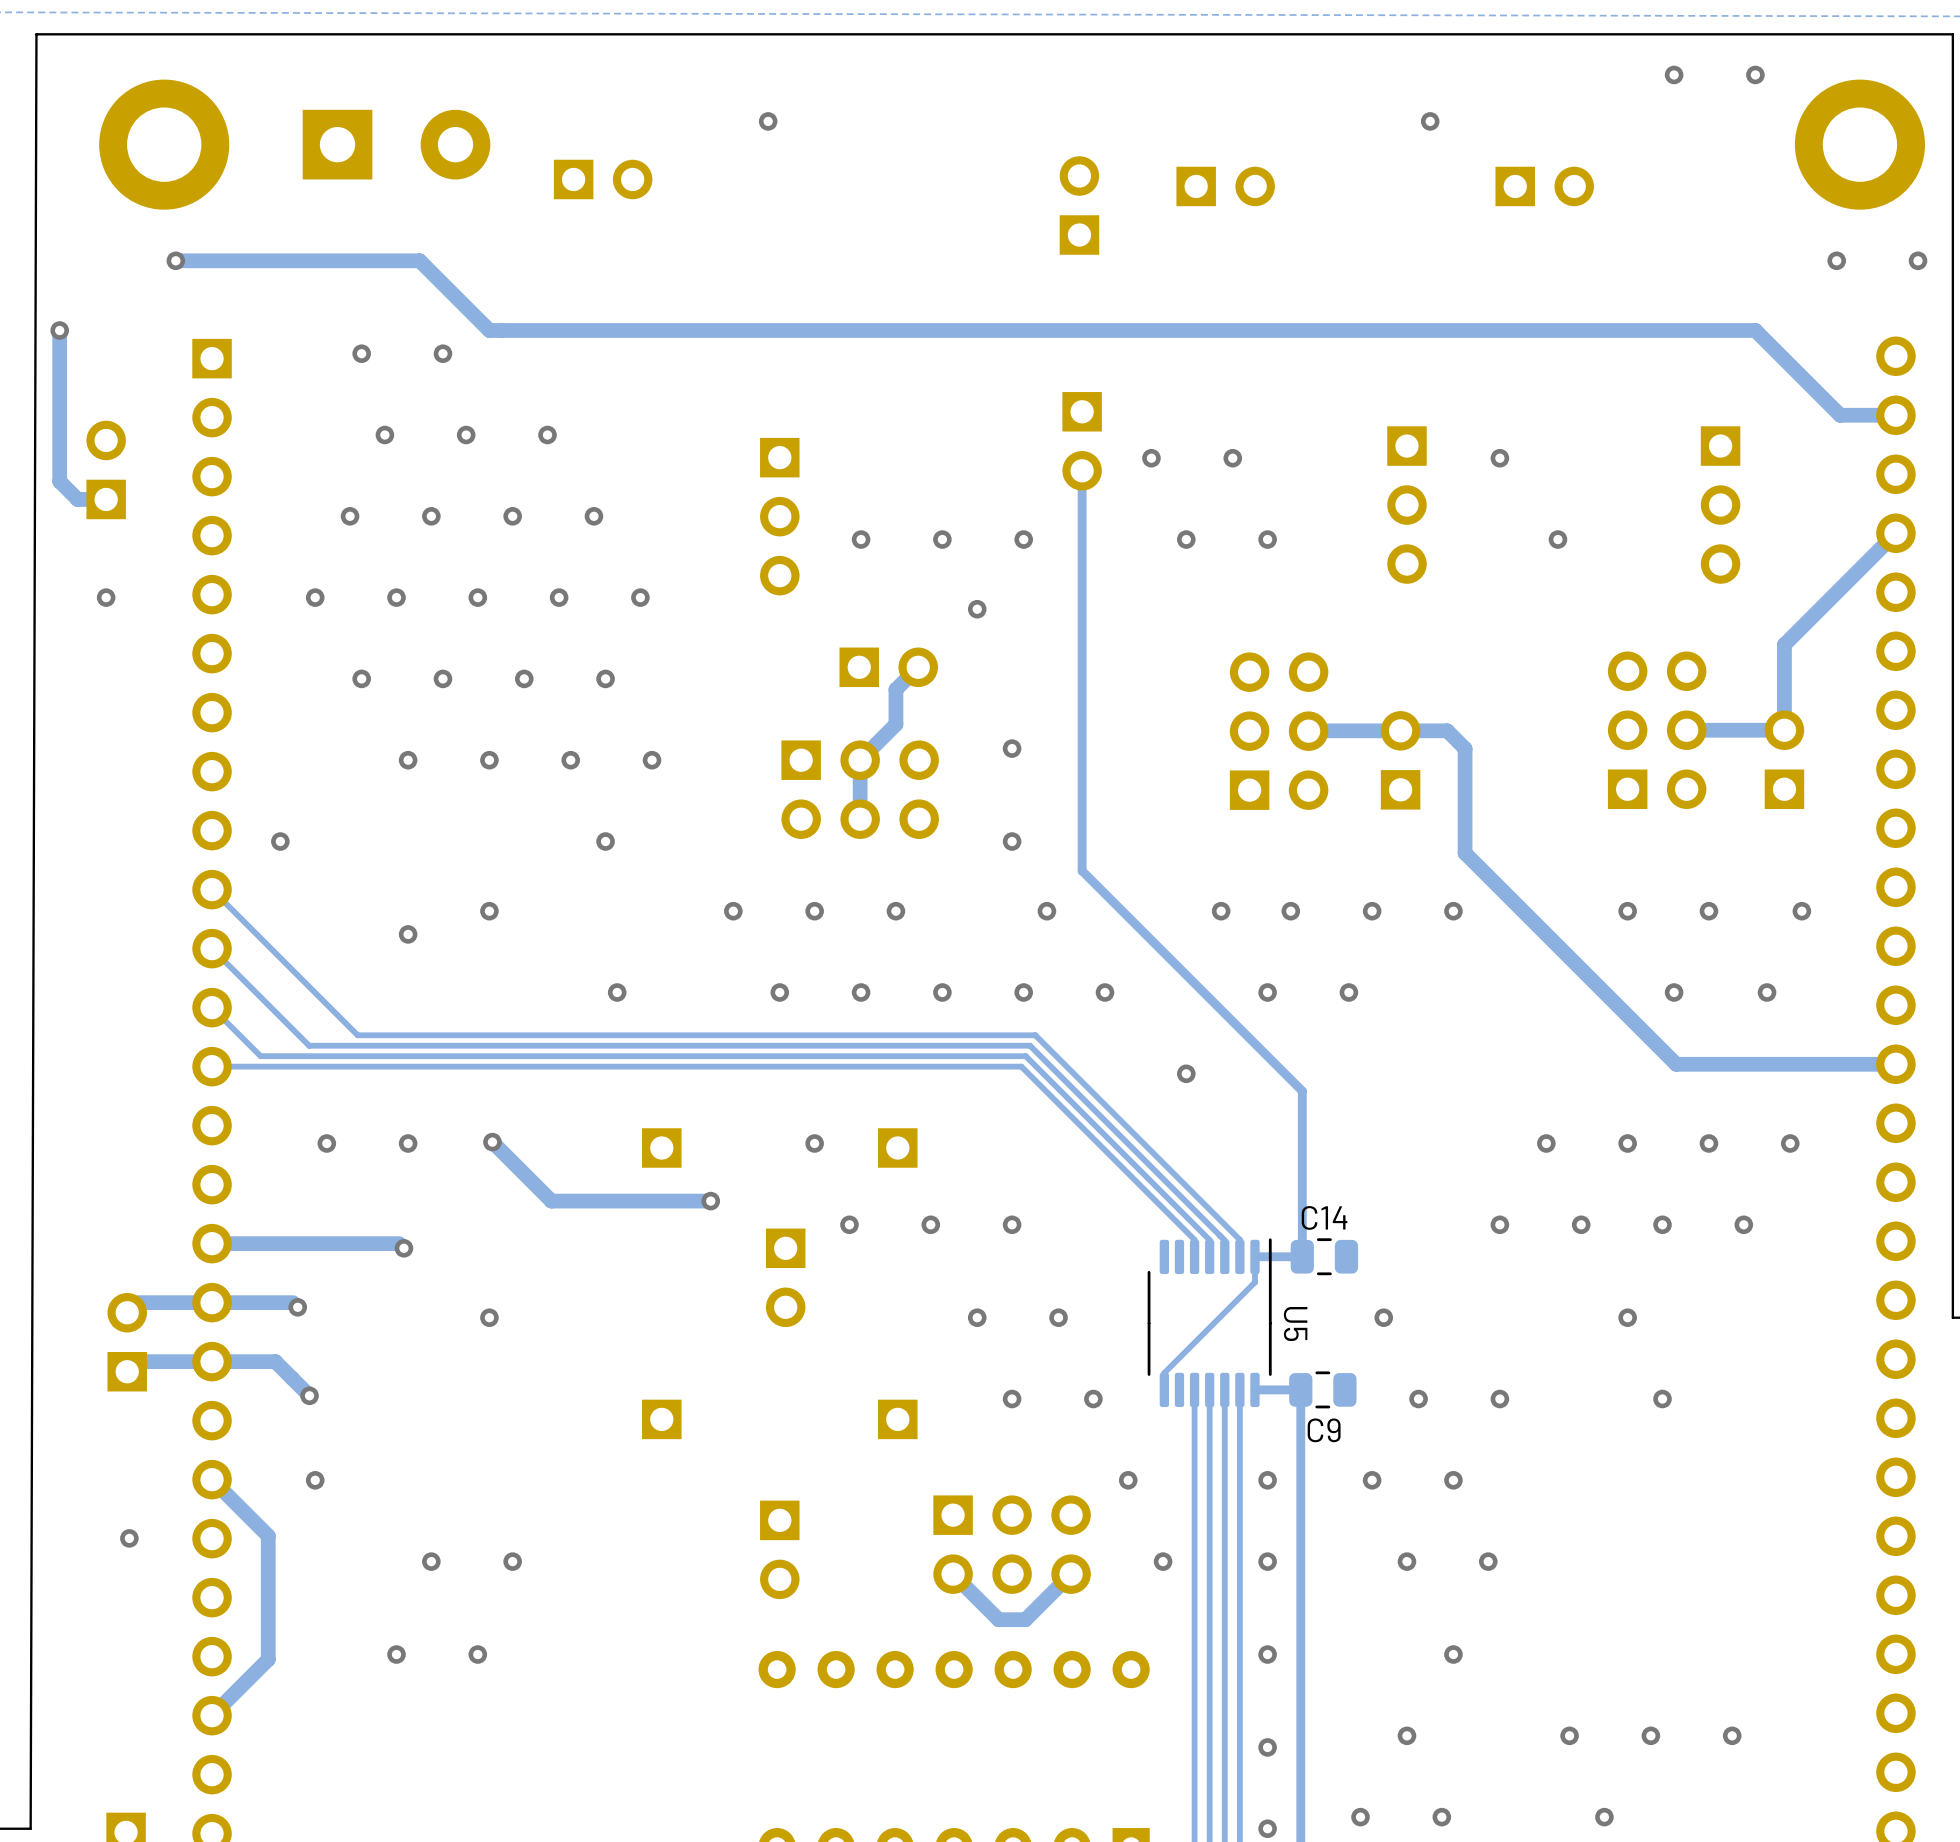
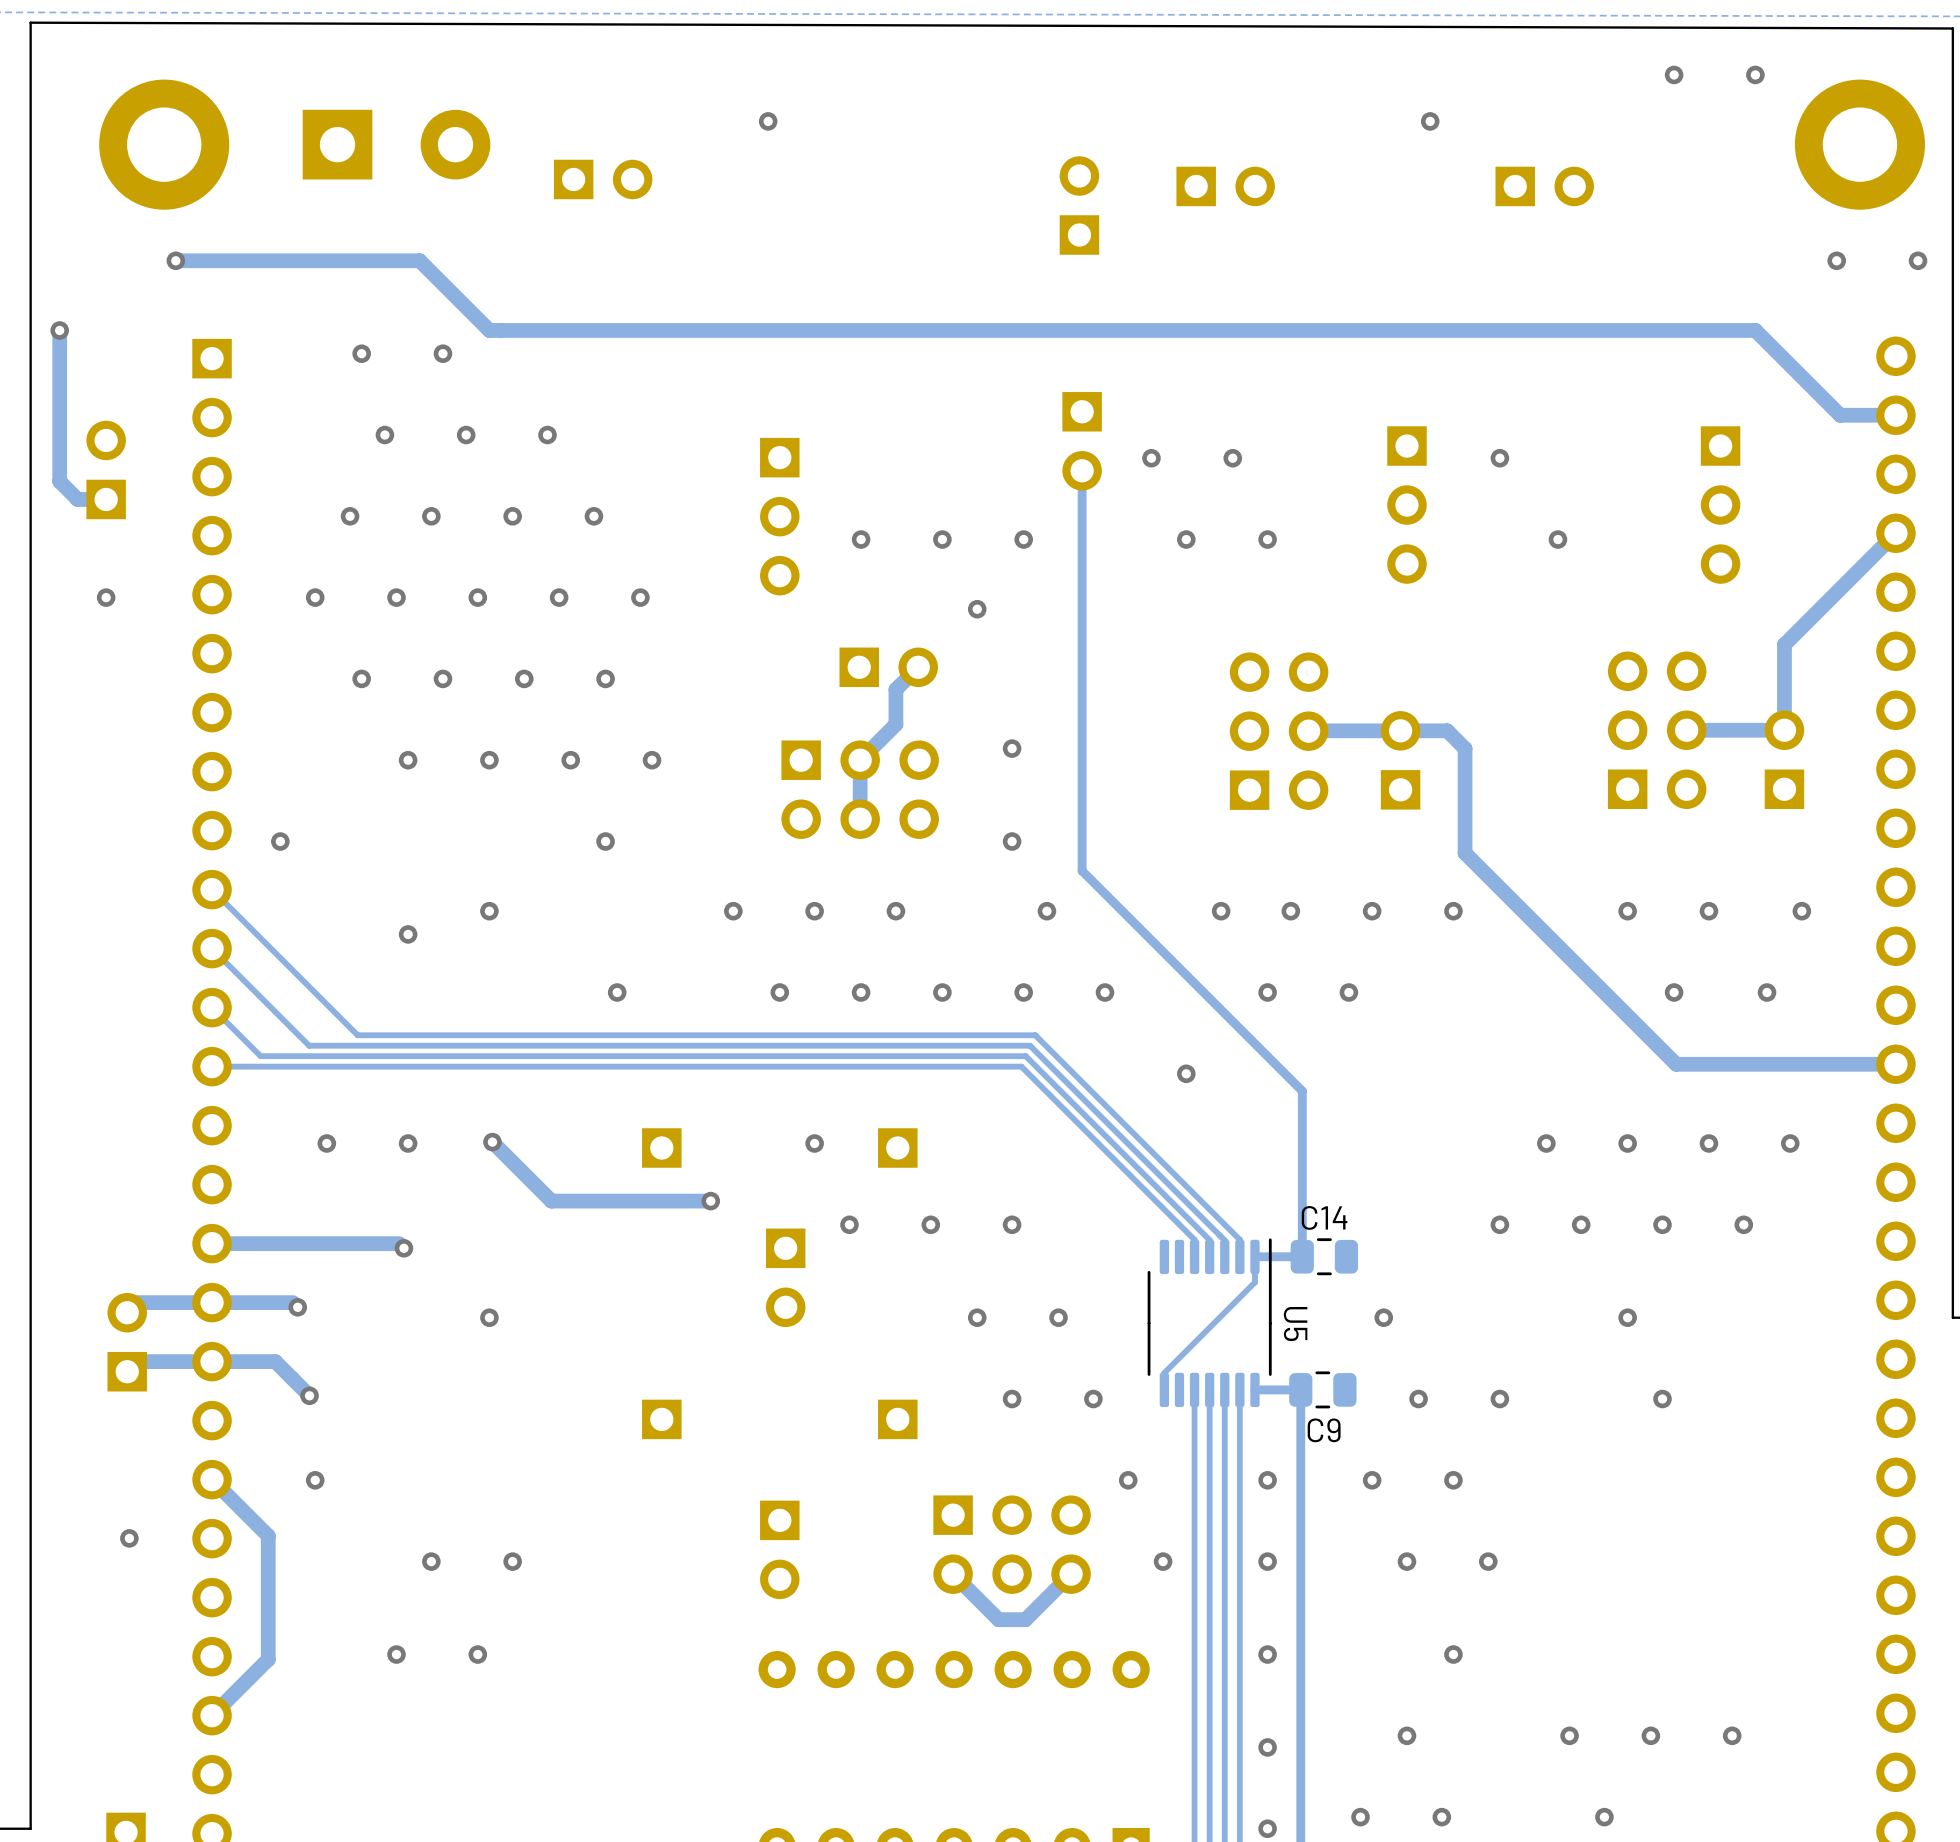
board edge: (1952, 34) (36, 34) (30, 1828) -> (1952, 34) (1952, 28) (30, 22) (30, 1828)

